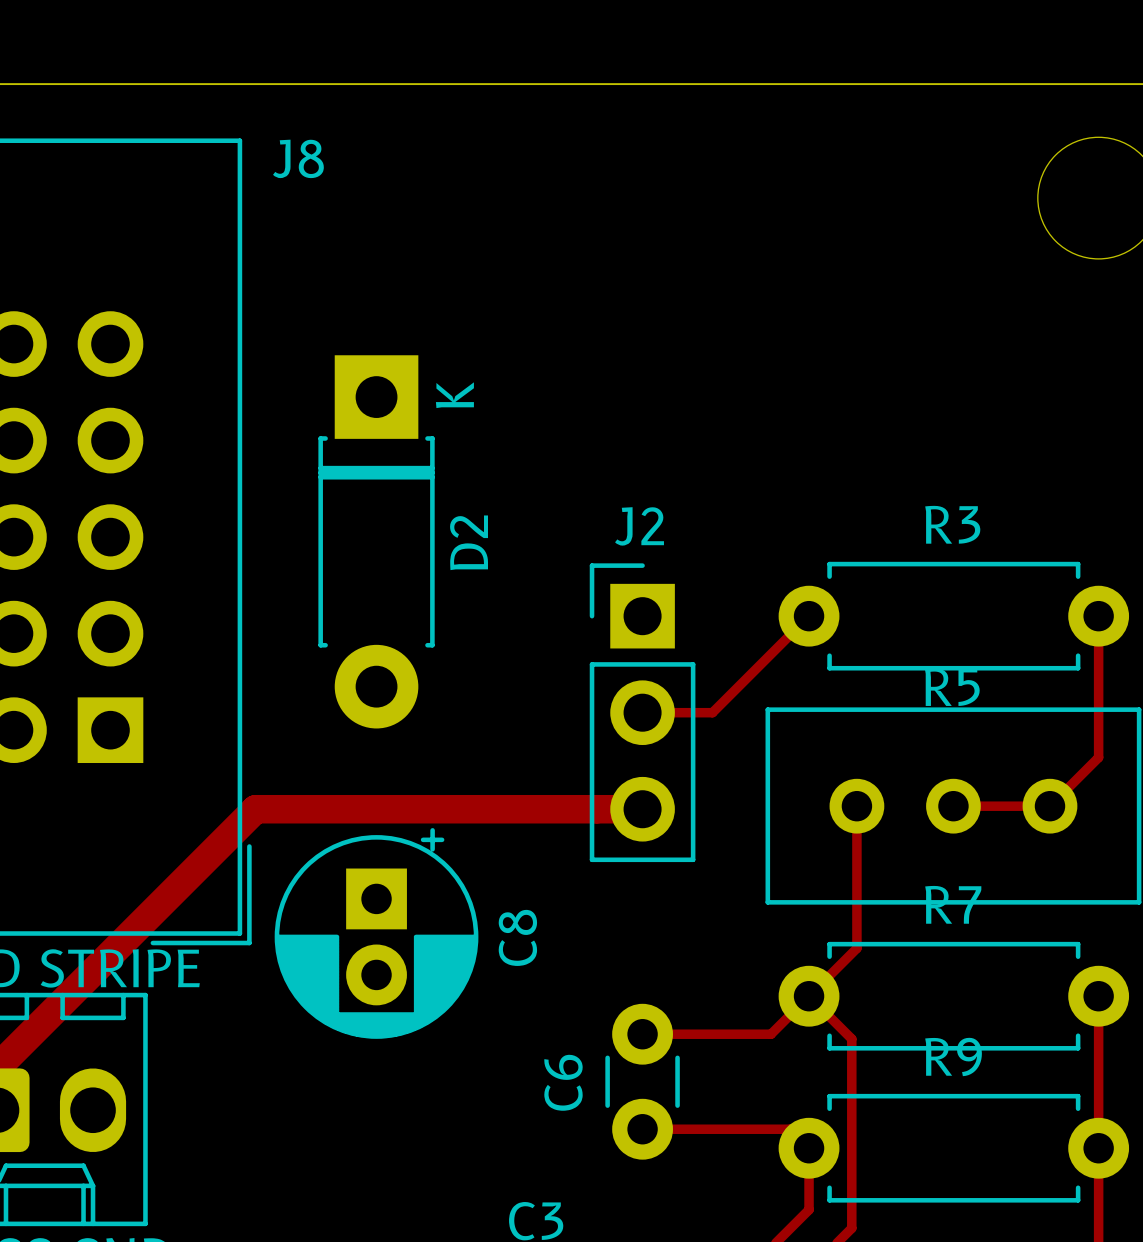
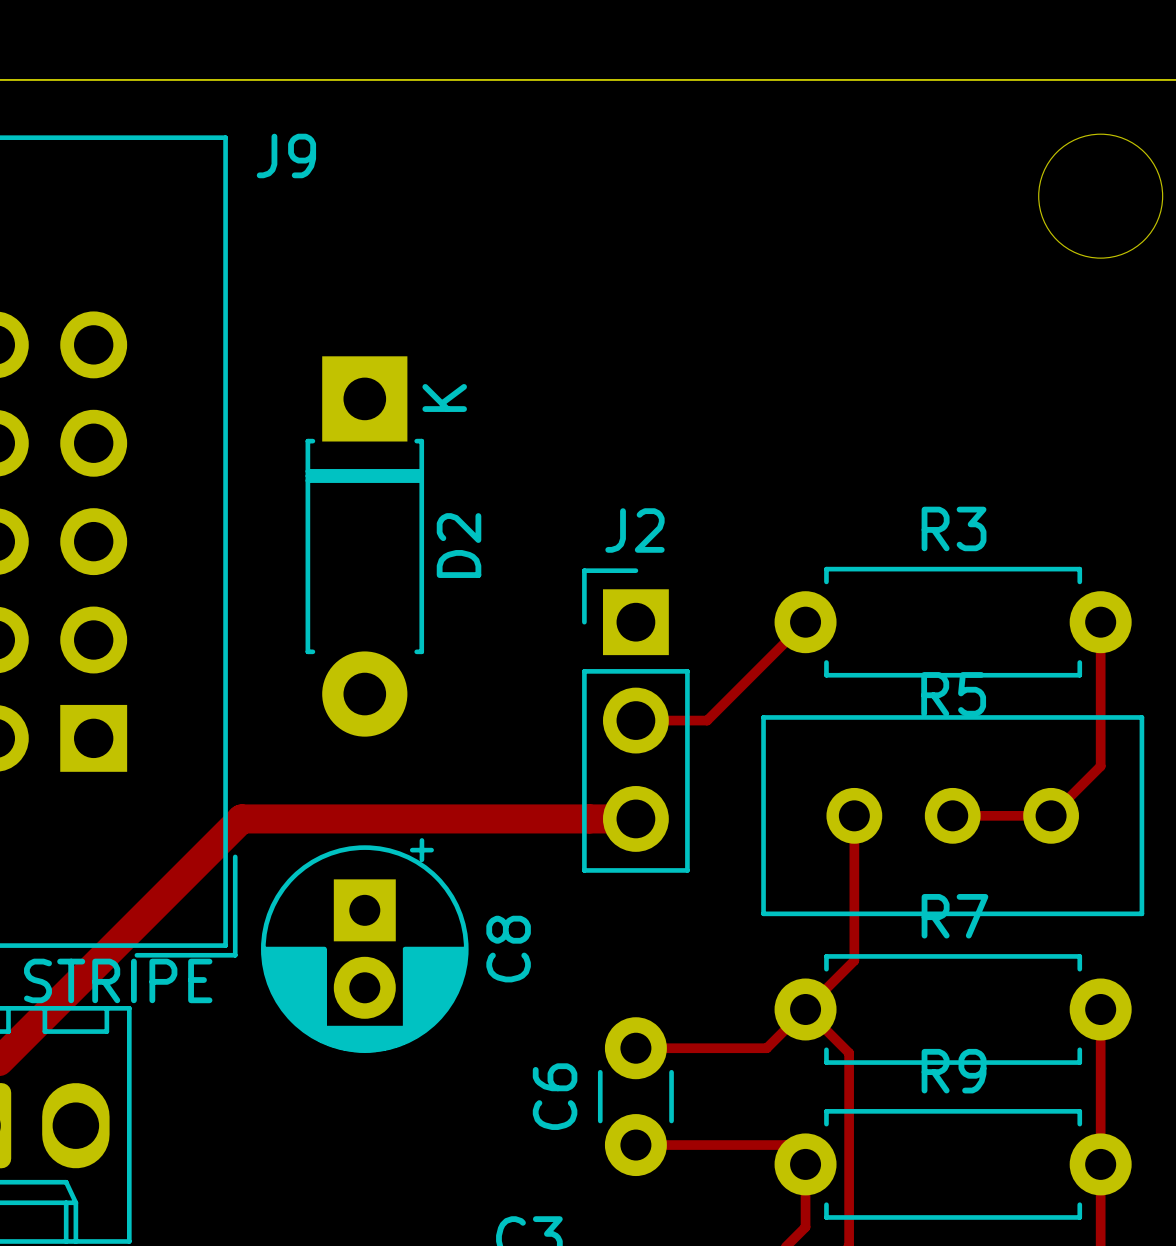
J8 name: J8 (298, 158) -> J9 (286, 155)

